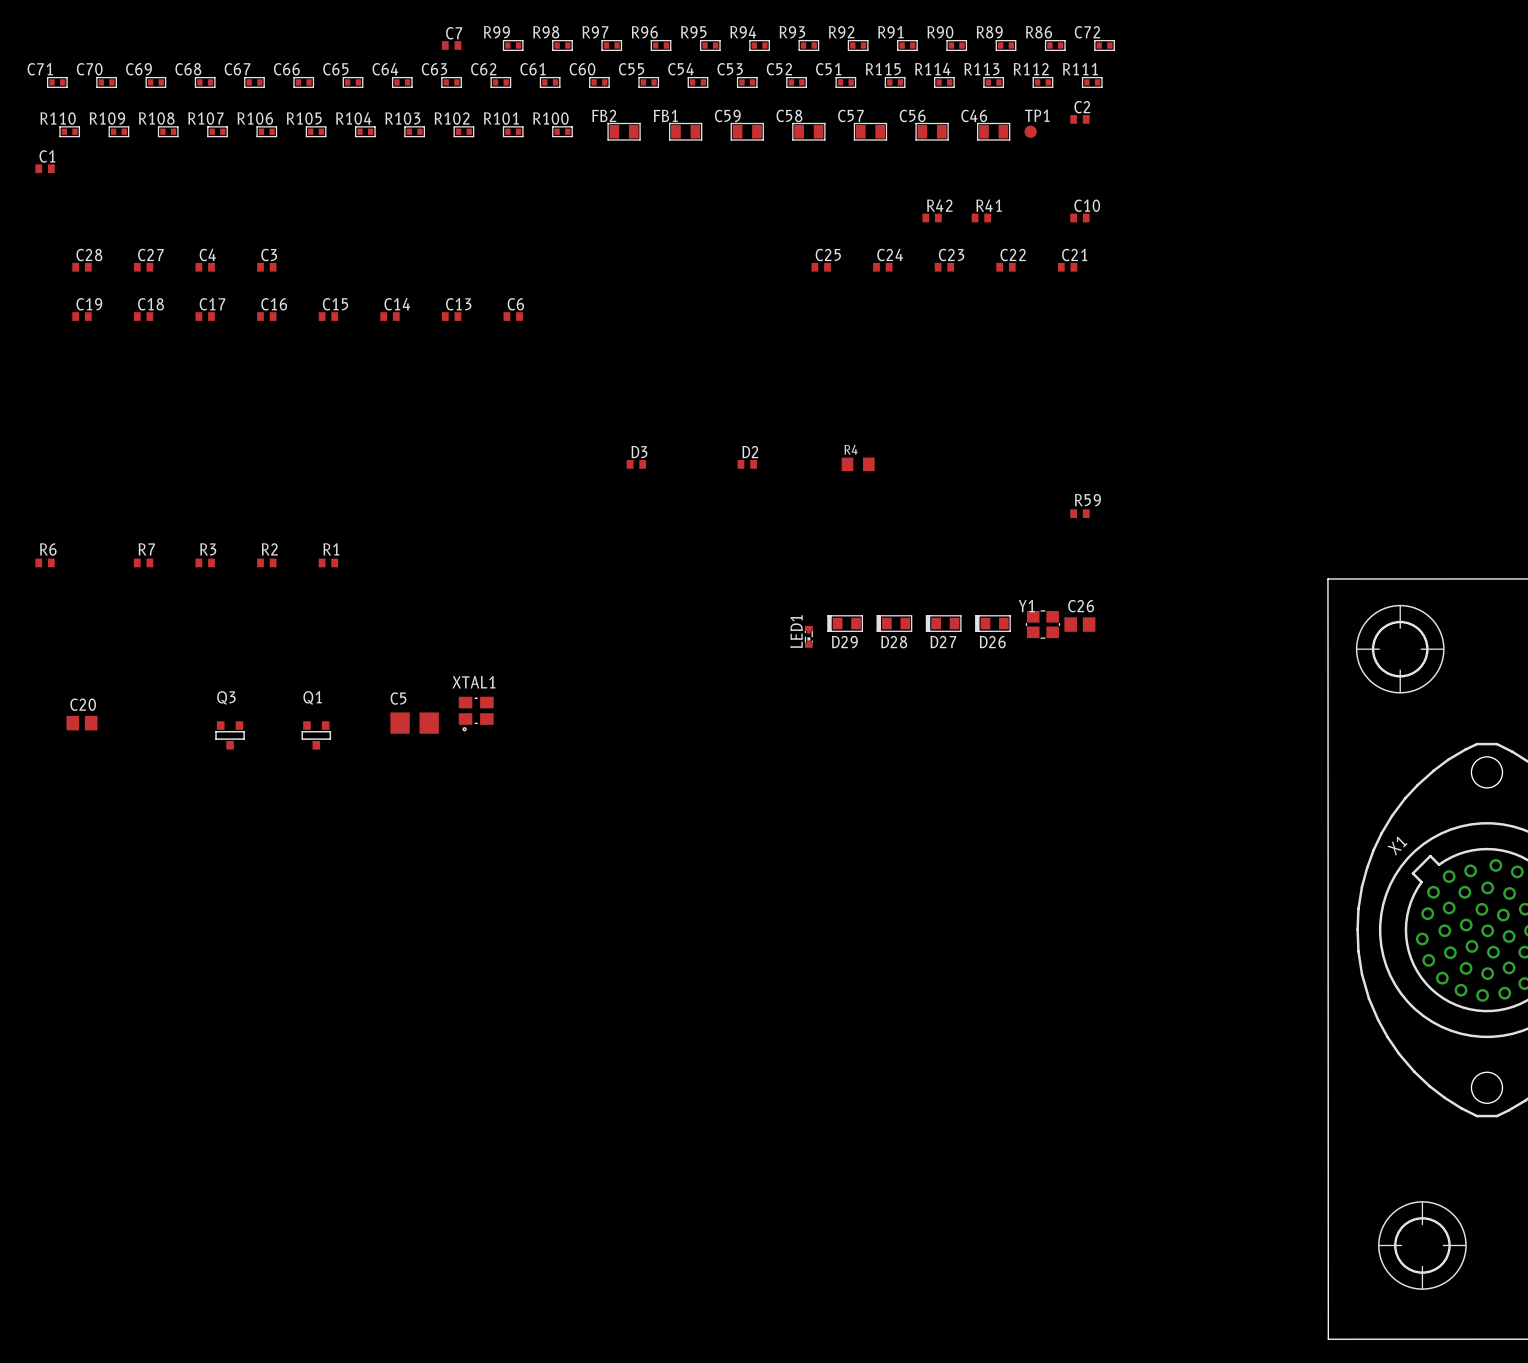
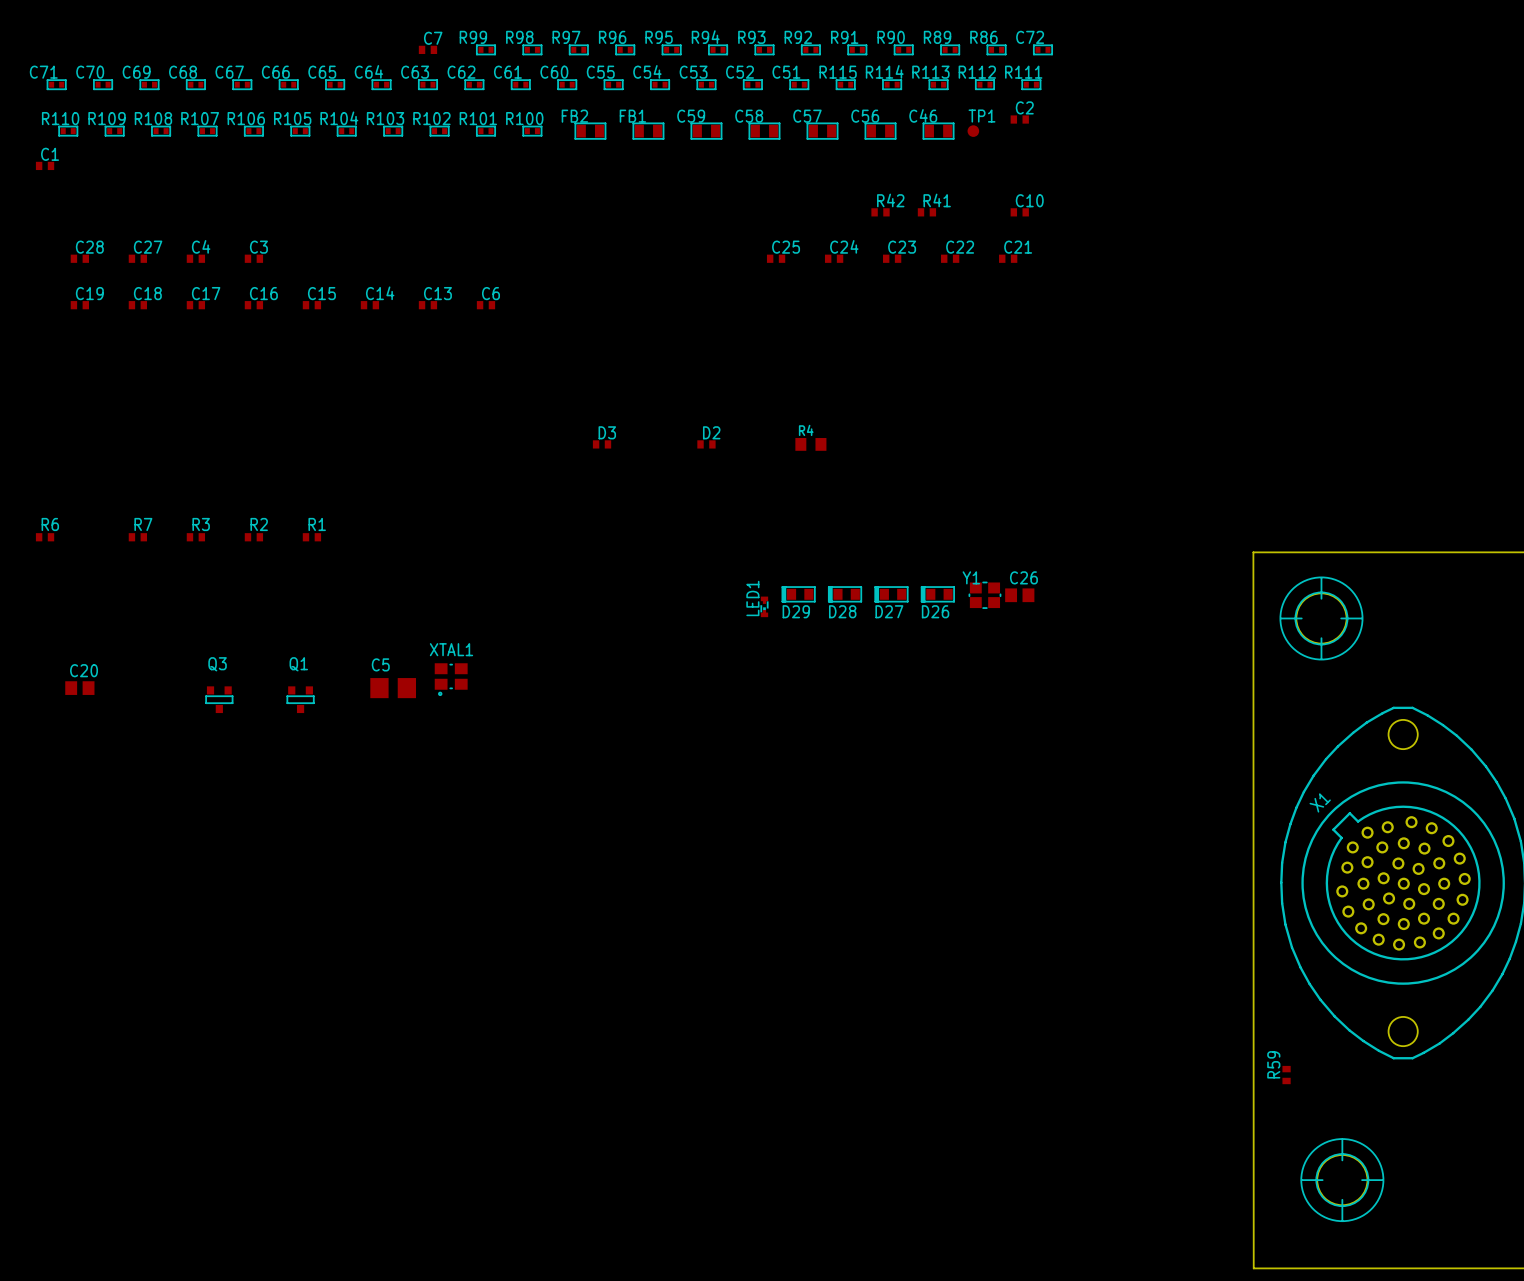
R59 name position: R59 (1087, 500) -> R59 (1273, 1064)
R59 rotation: 0° (1079, 513) -> 90° clockwise (1286, 1075)
R59 position: (1079, 513) -> (1286, 1075)

